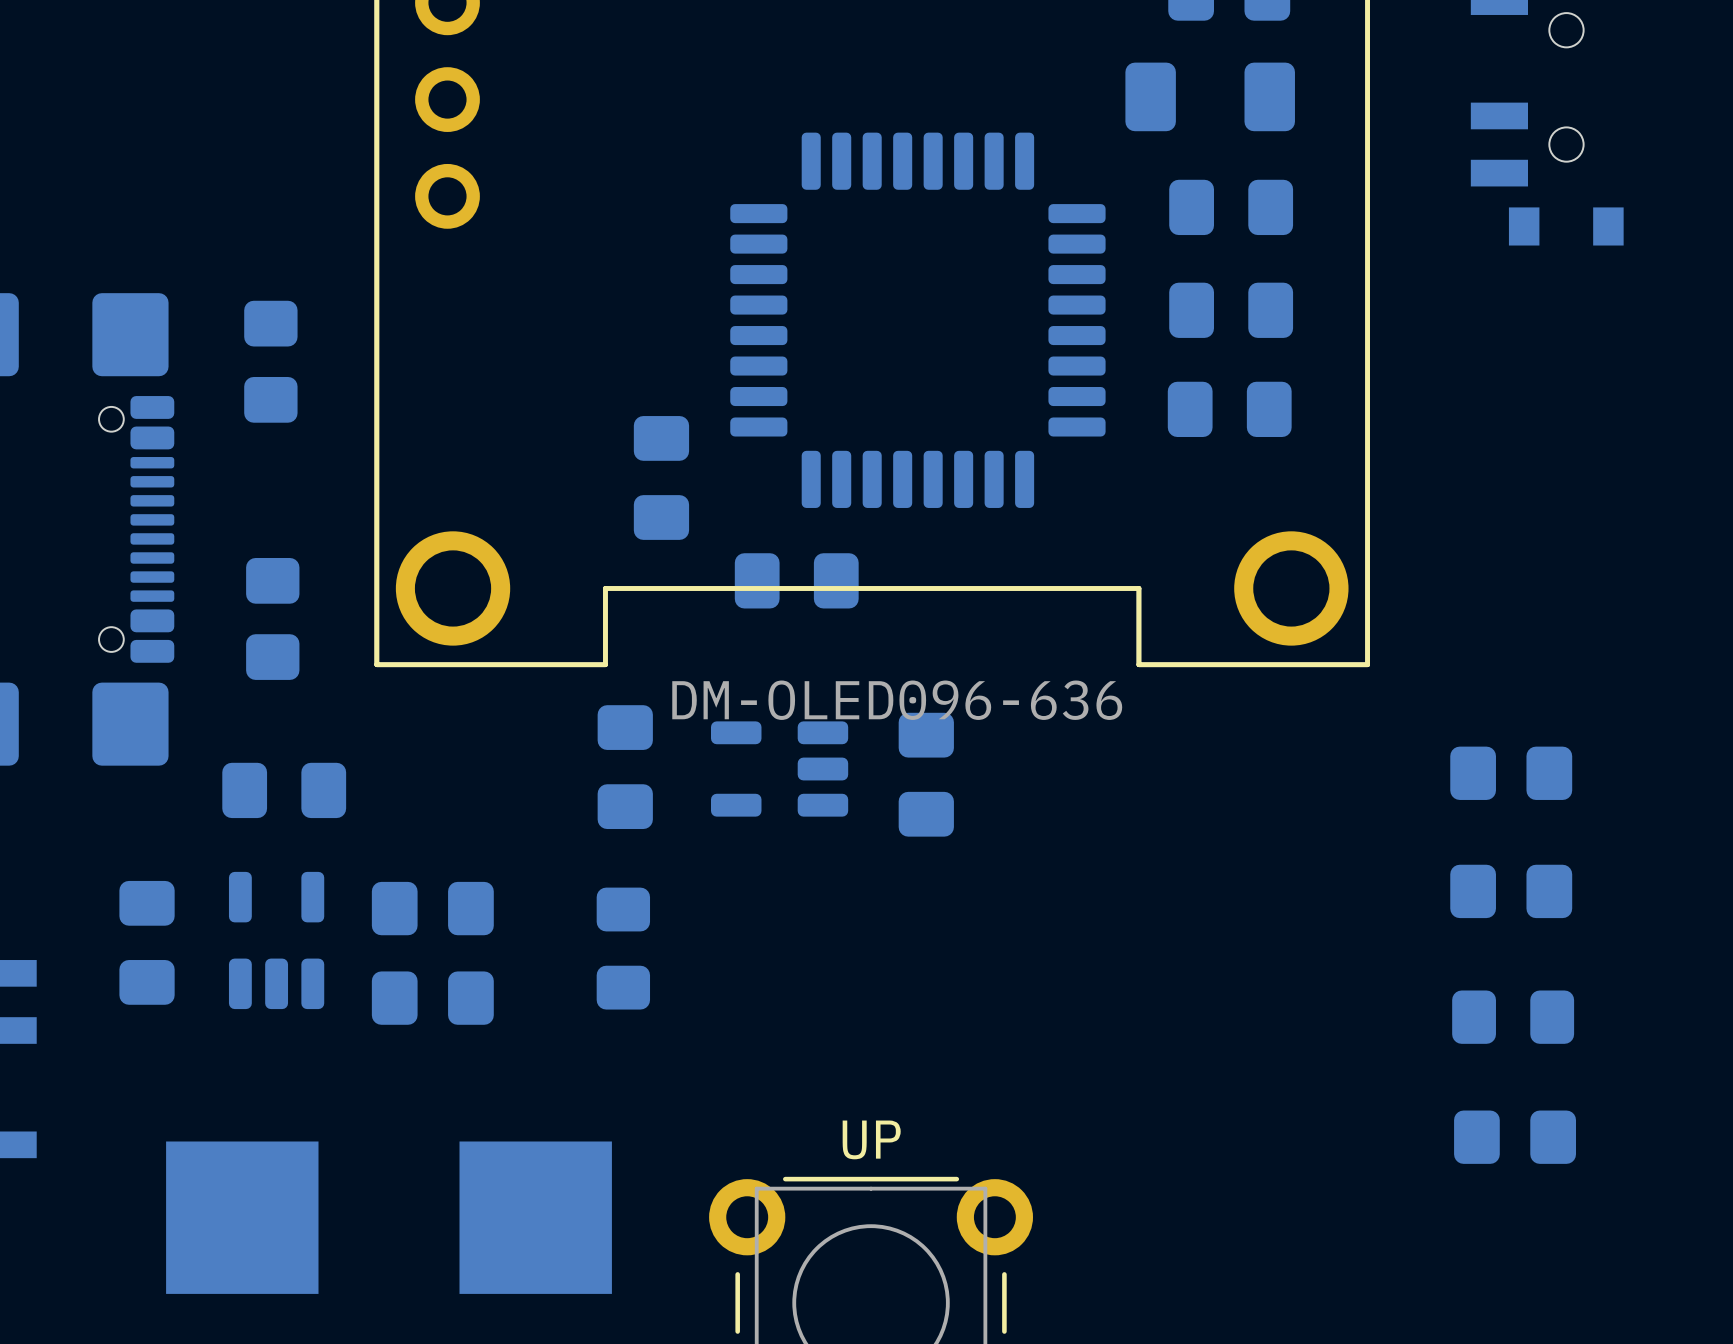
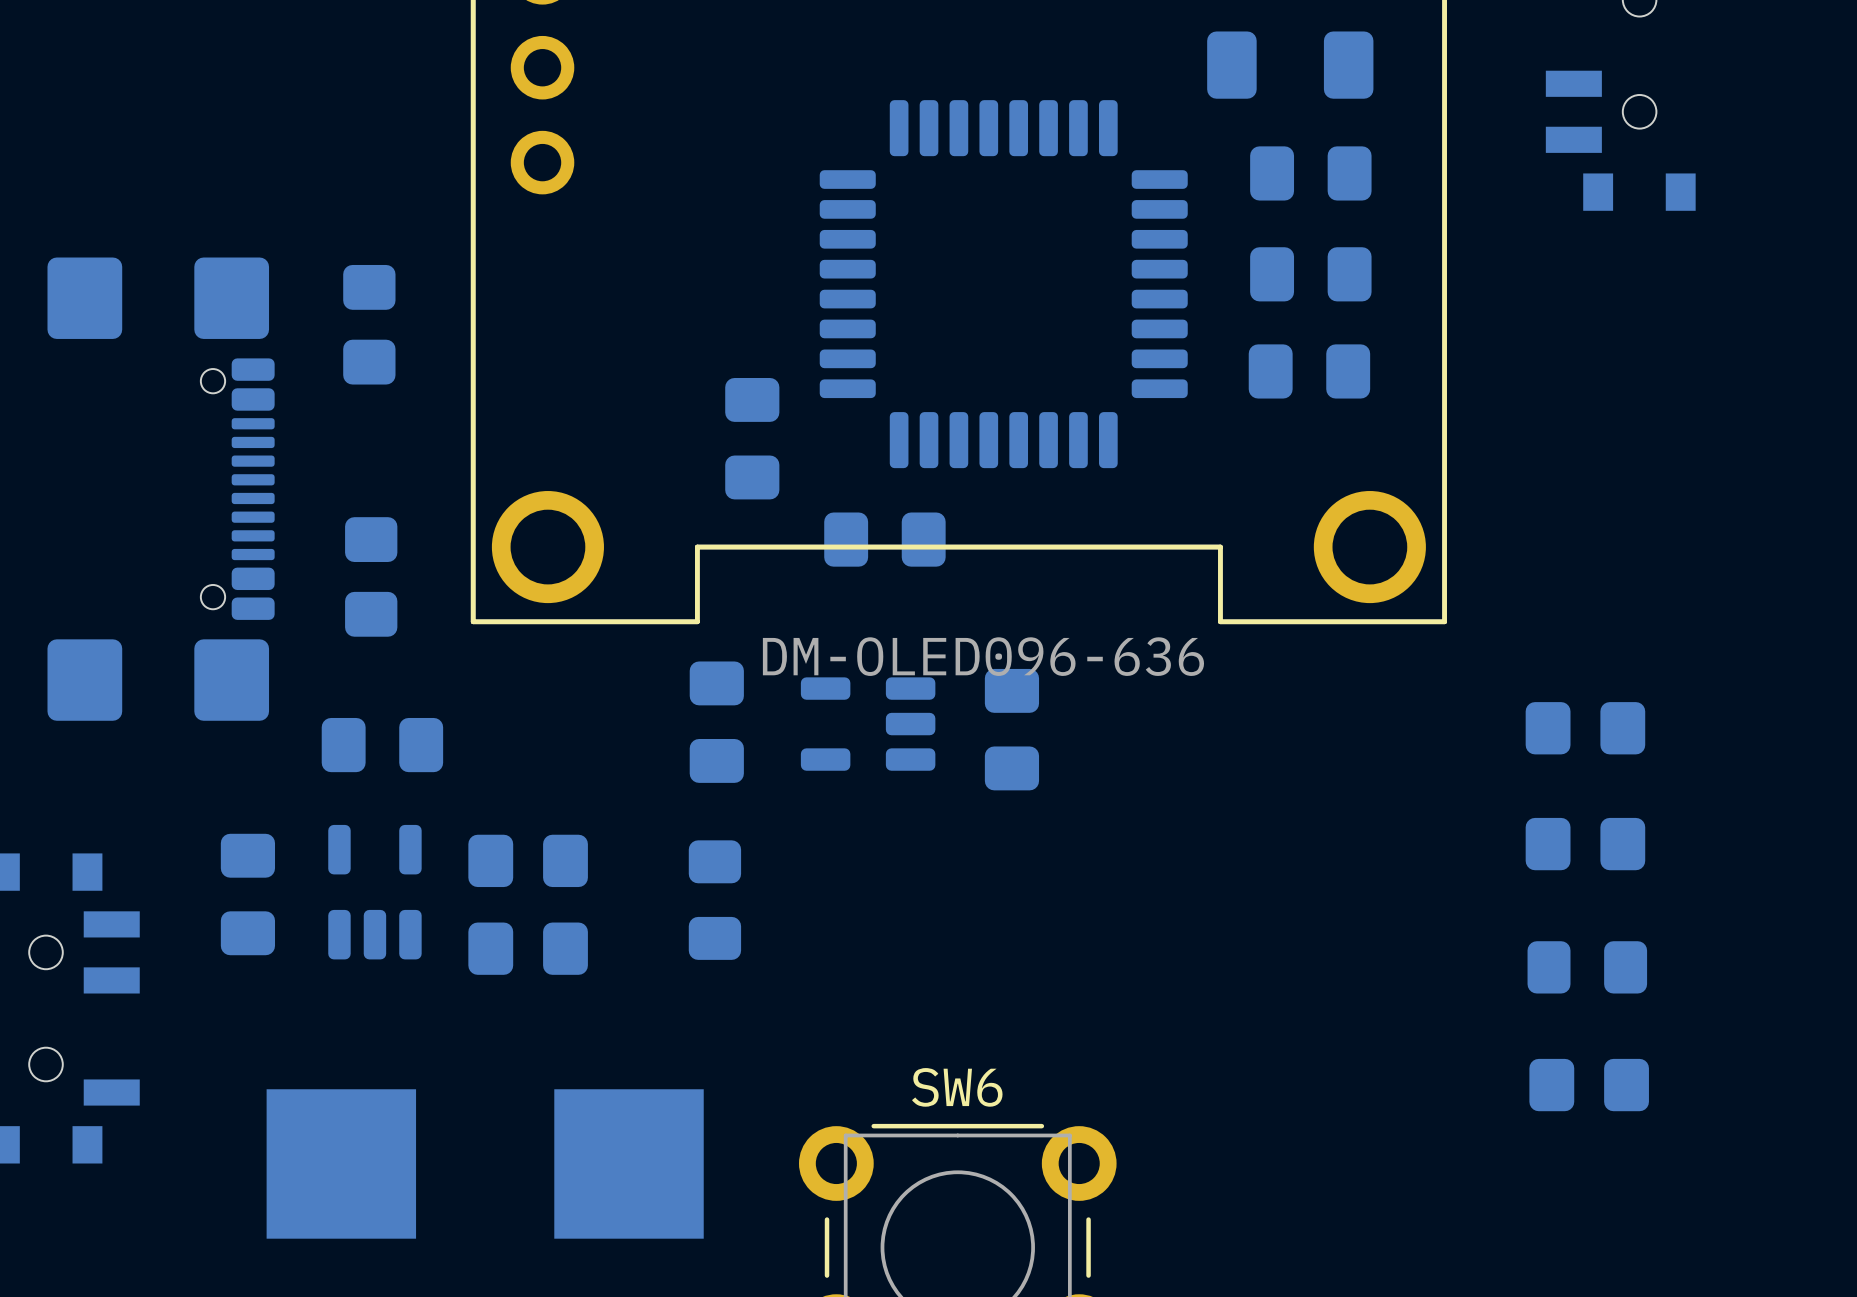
UP name: UP (871, 1139) -> SW6 (957, 1087)

